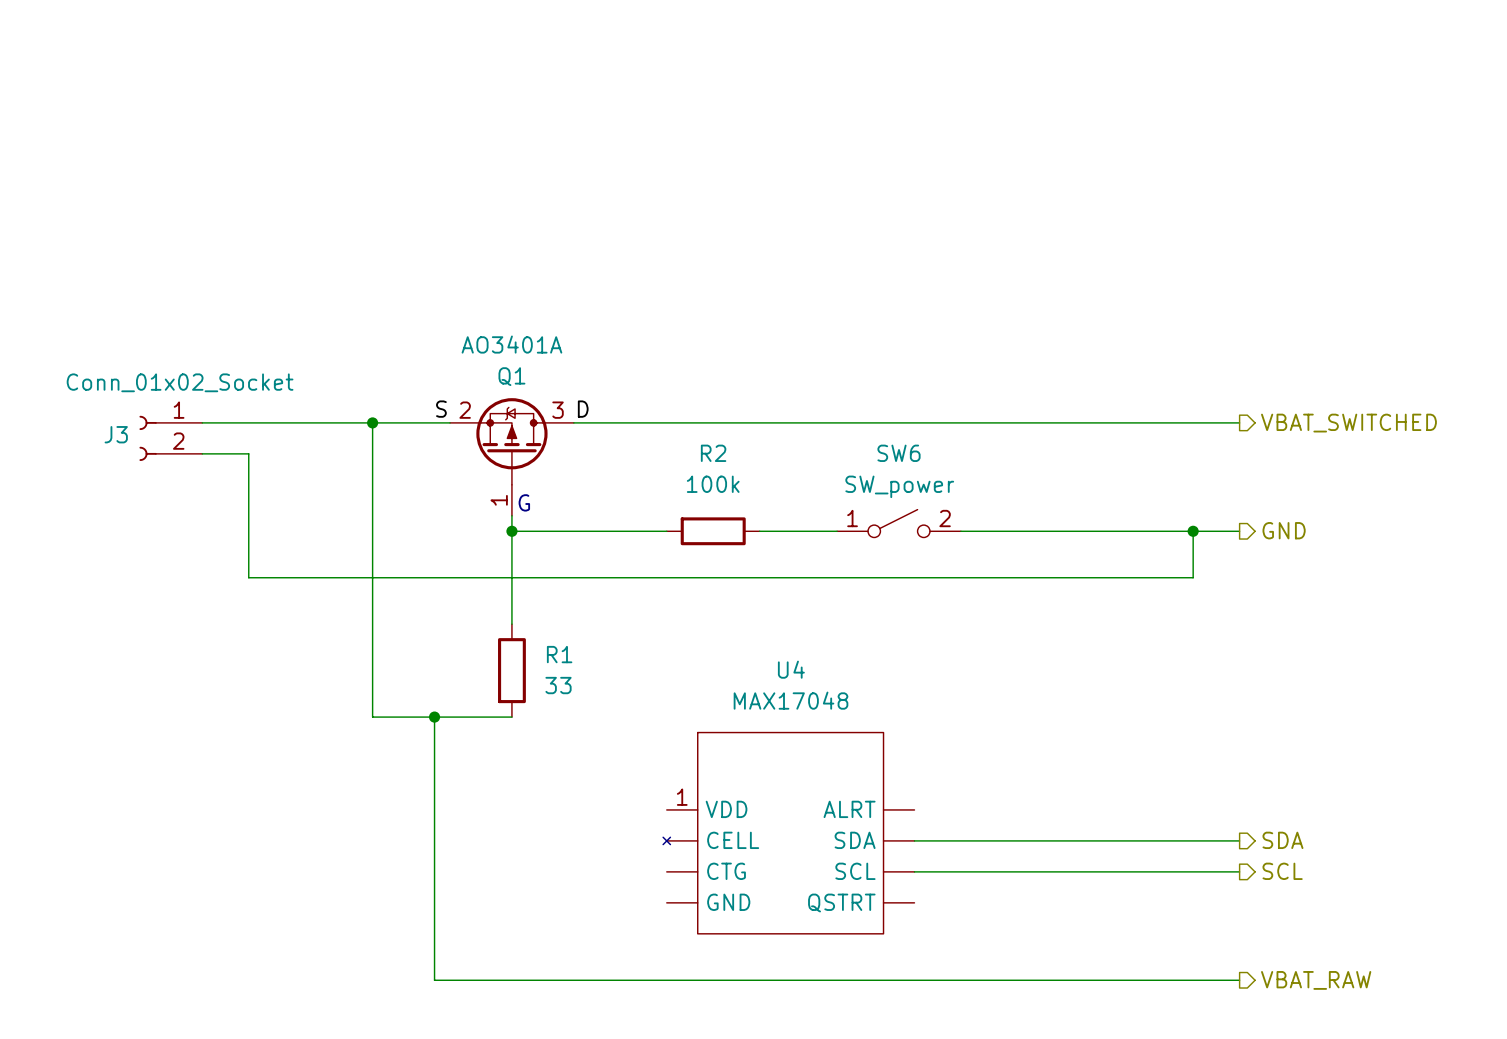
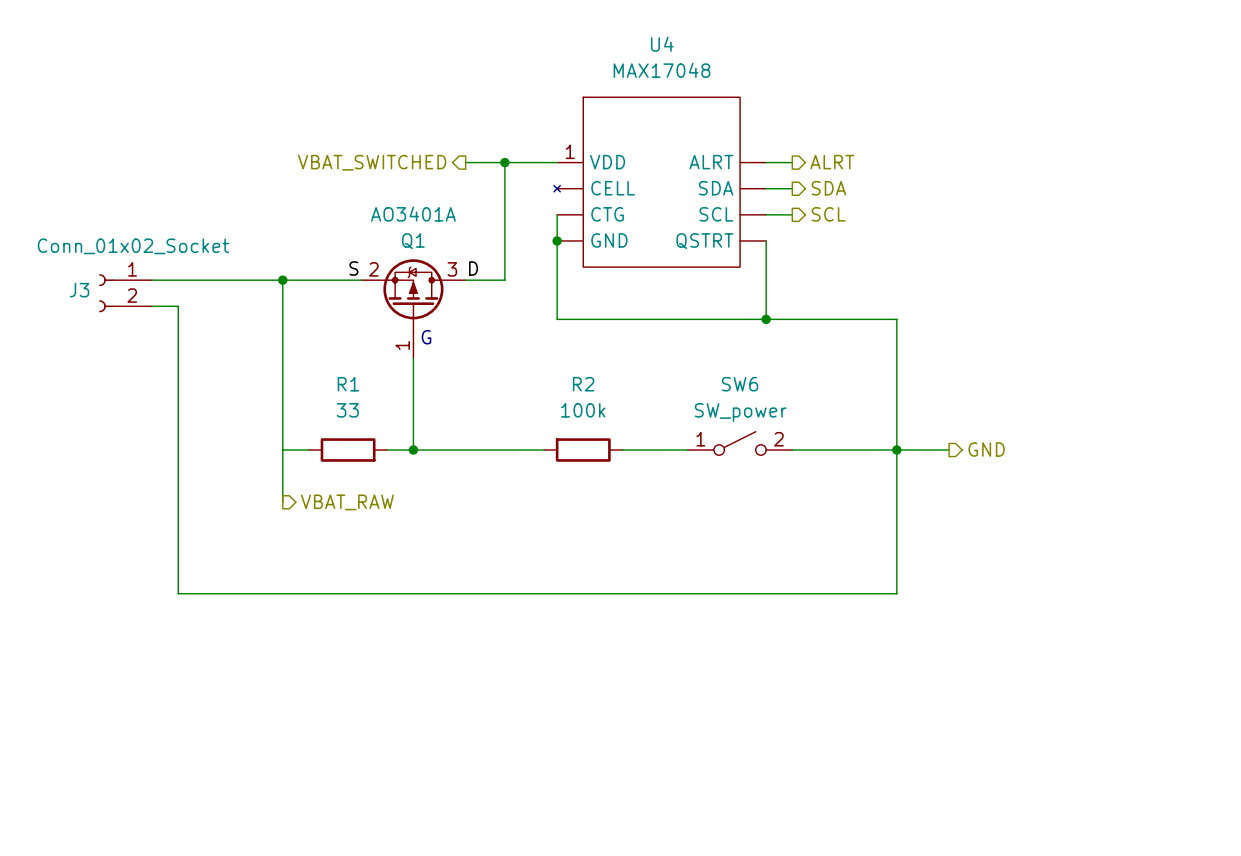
hierarchical label: none -> VBAT_SWITCHED (372, 162)
wire: none -> (465, 162) (557, 162)
wire: none -> (504, 162) (504, 280) (465, 280)
junction: none -> (504, 162)
wire: none -> (766, 162) (792, 162)
hierarchical label: none -> ALRT (832, 162)
wire: none -> (766, 188) (792, 188)
hierarchical label: none -> SDA (828, 188)
wire: none -> (557, 214) (557, 319) (896, 319) (896, 593) (178, 593) (178, 306) (152, 306)
wire: none -> (766, 214) (792, 214)
hierarchical label: none -> SCL (828, 214)
junction: none -> (557, 240)
wire: none -> (766, 240) (766, 319)
wire: none -> (282, 280) (282, 502)
junction: none -> (282, 280)
junction: none -> (766, 319)
label position: S (441, 409) -> S (353, 268)
label position: D (583, 409) -> D (473, 268)
wire: (202, 422) (450, 422) -> (152, 280) (361, 280)
wire: (372, 422) (372, 717) (511, 717) -> none
junction: (372, 422) -> none
wire: (573, 422) (1239, 422) -> none
hierarchical label: VBAT_SWITCHED (1348, 423) -> none
J3 position: (170, 438) -> (125, 293)
wire: (202, 453) (248, 453) (248, 577) (1193, 577) (1193, 531) -> none
Q1 position: (511, 456) -> (413, 308)
text position: G (524, 502) -> G (426, 337)
hierarchical label position: GND (1284, 530) -> GND (986, 449)
wire: none -> (282, 450) (308, 450)
wire: (511, 531) (511, 624) -> (413, 450) (387, 450)
junction: none -> (896, 450)
wire: (1146, 531) (1239, 531) -> none
junction: (1193, 531) -> none
hierarchical label: none -> VBAT_RAW (347, 502)
R1 name position: R1 (559, 654) -> R1 (348, 384)
R1 rotation: 0° (511, 670) -> 90° clockwise (348, 450)
R1 position: (511, 670) -> (348, 450)
R1 value position: 33 (558, 685) -> 33 (347, 410)
wire: (434, 717) (434, 980) (1239, 980) -> none
junction: (434, 717) -> none
U4 position: (788, 833) -> (660, 182)
wire: (914, 840) (1239, 840) -> none
hierarchical label: SDA (1282, 840) -> none
wire: (914, 871) (1239, 871) -> none
hierarchical label: SCL (1282, 871) -> none
hierarchical label: VBAT_RAW (1316, 980) -> none

